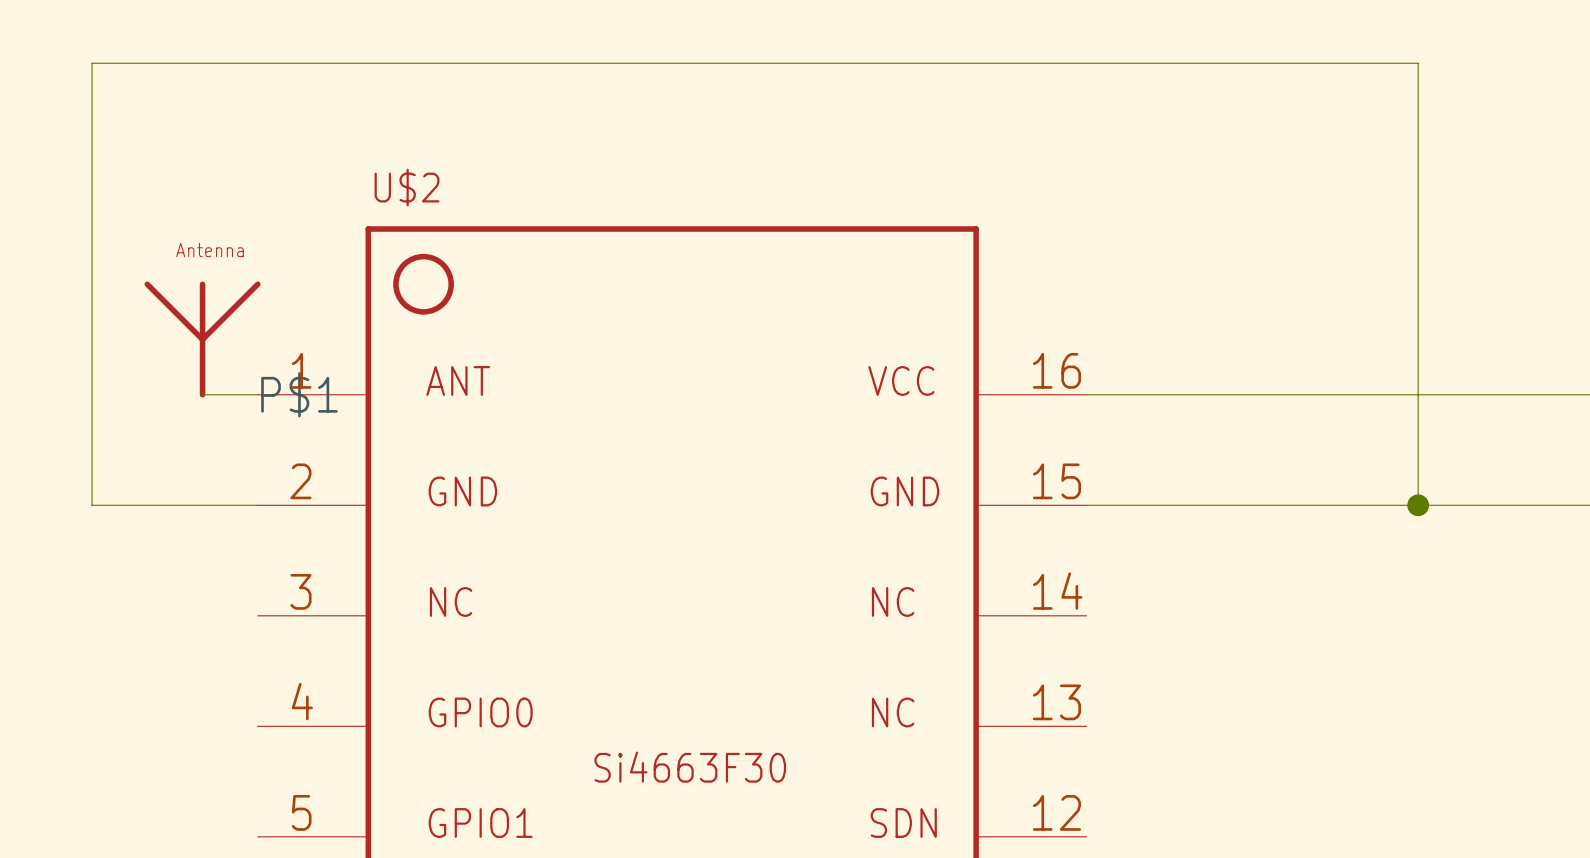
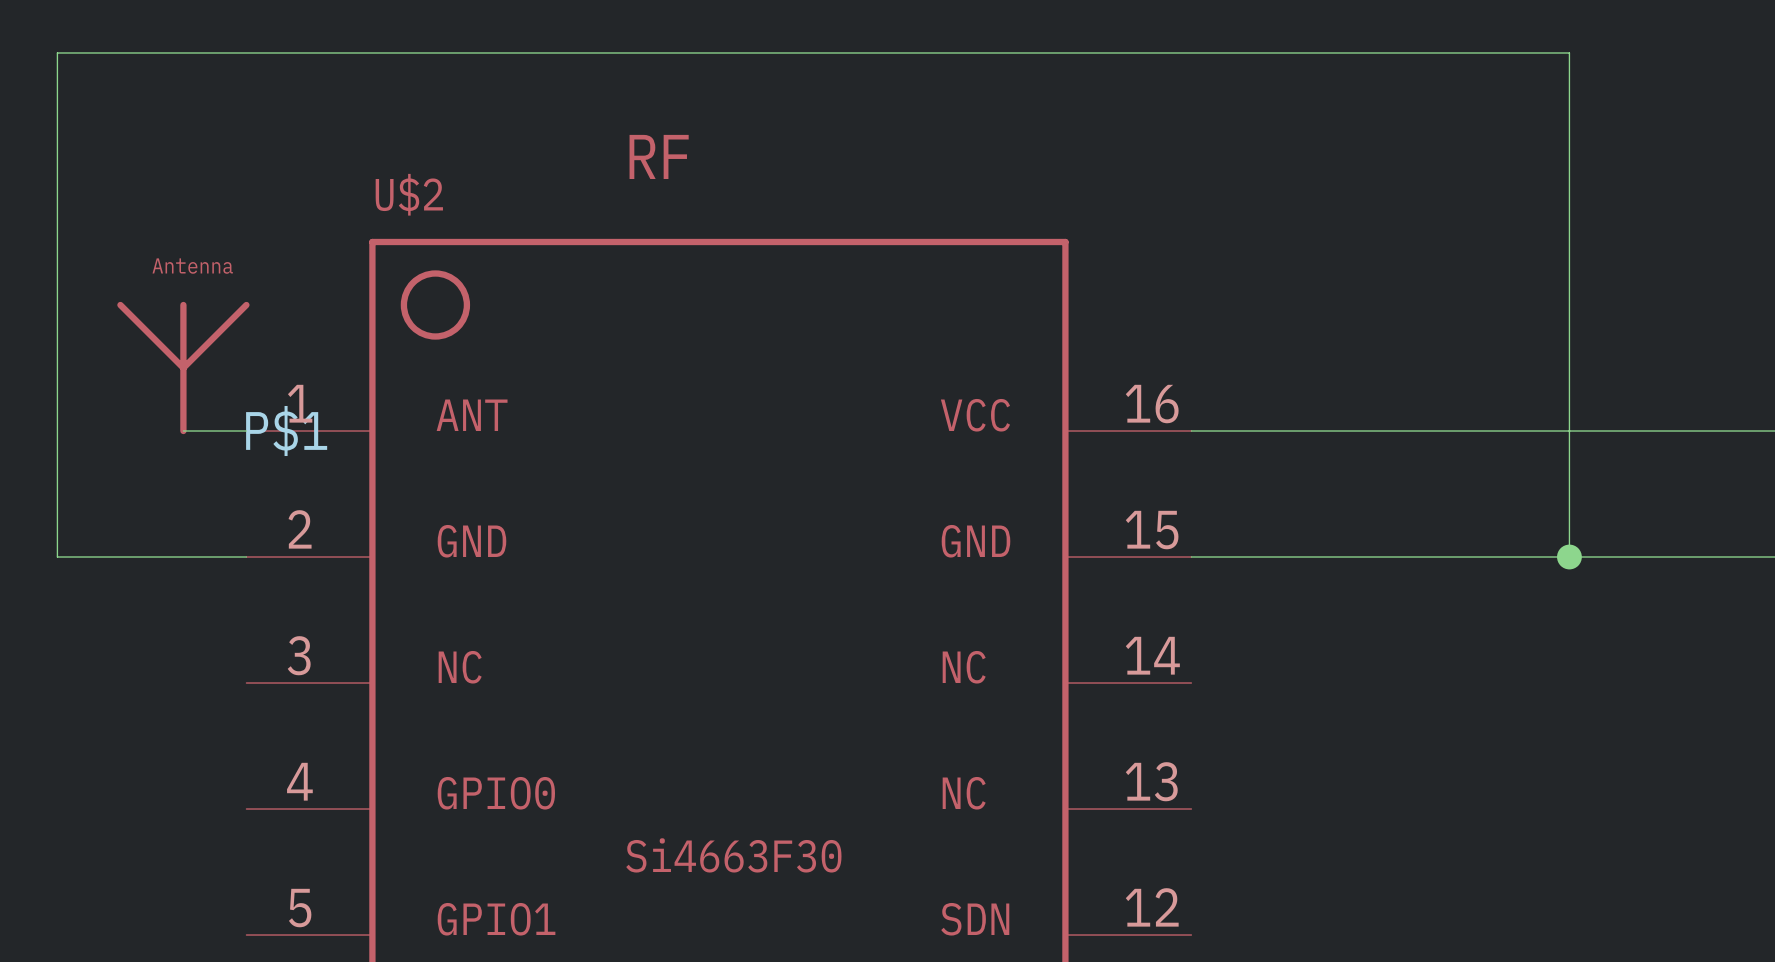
text: none -> RF (659, 156)

